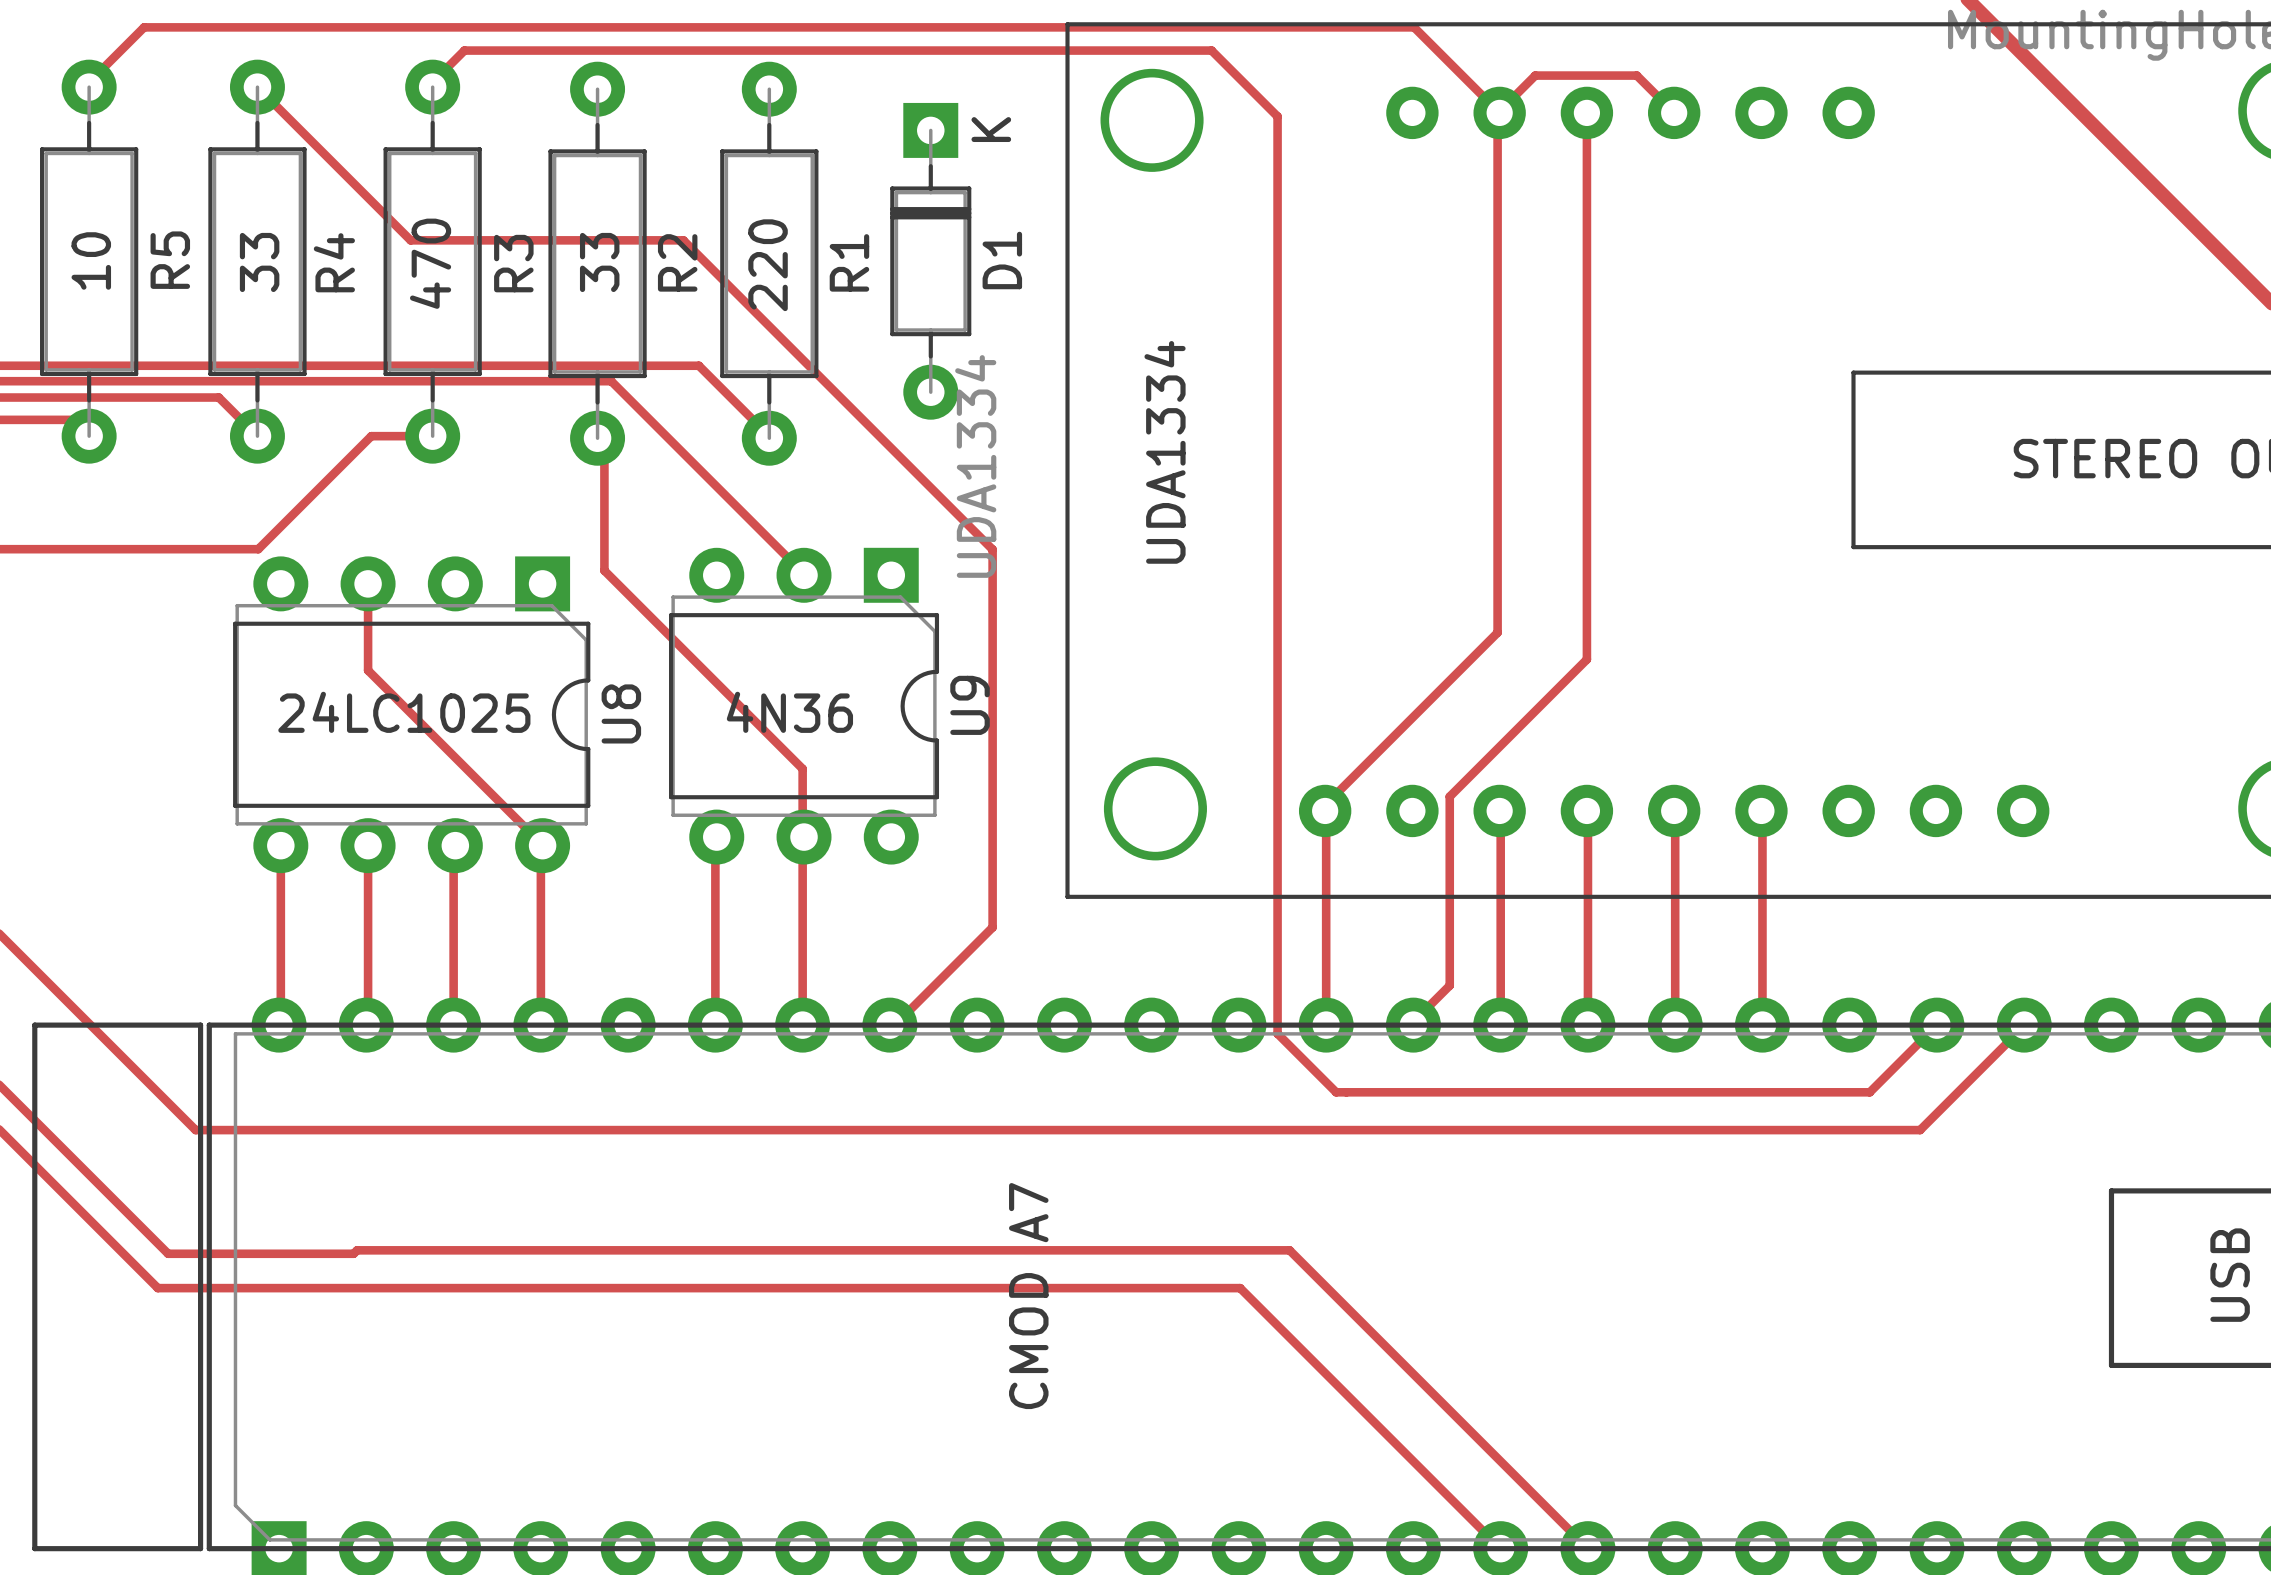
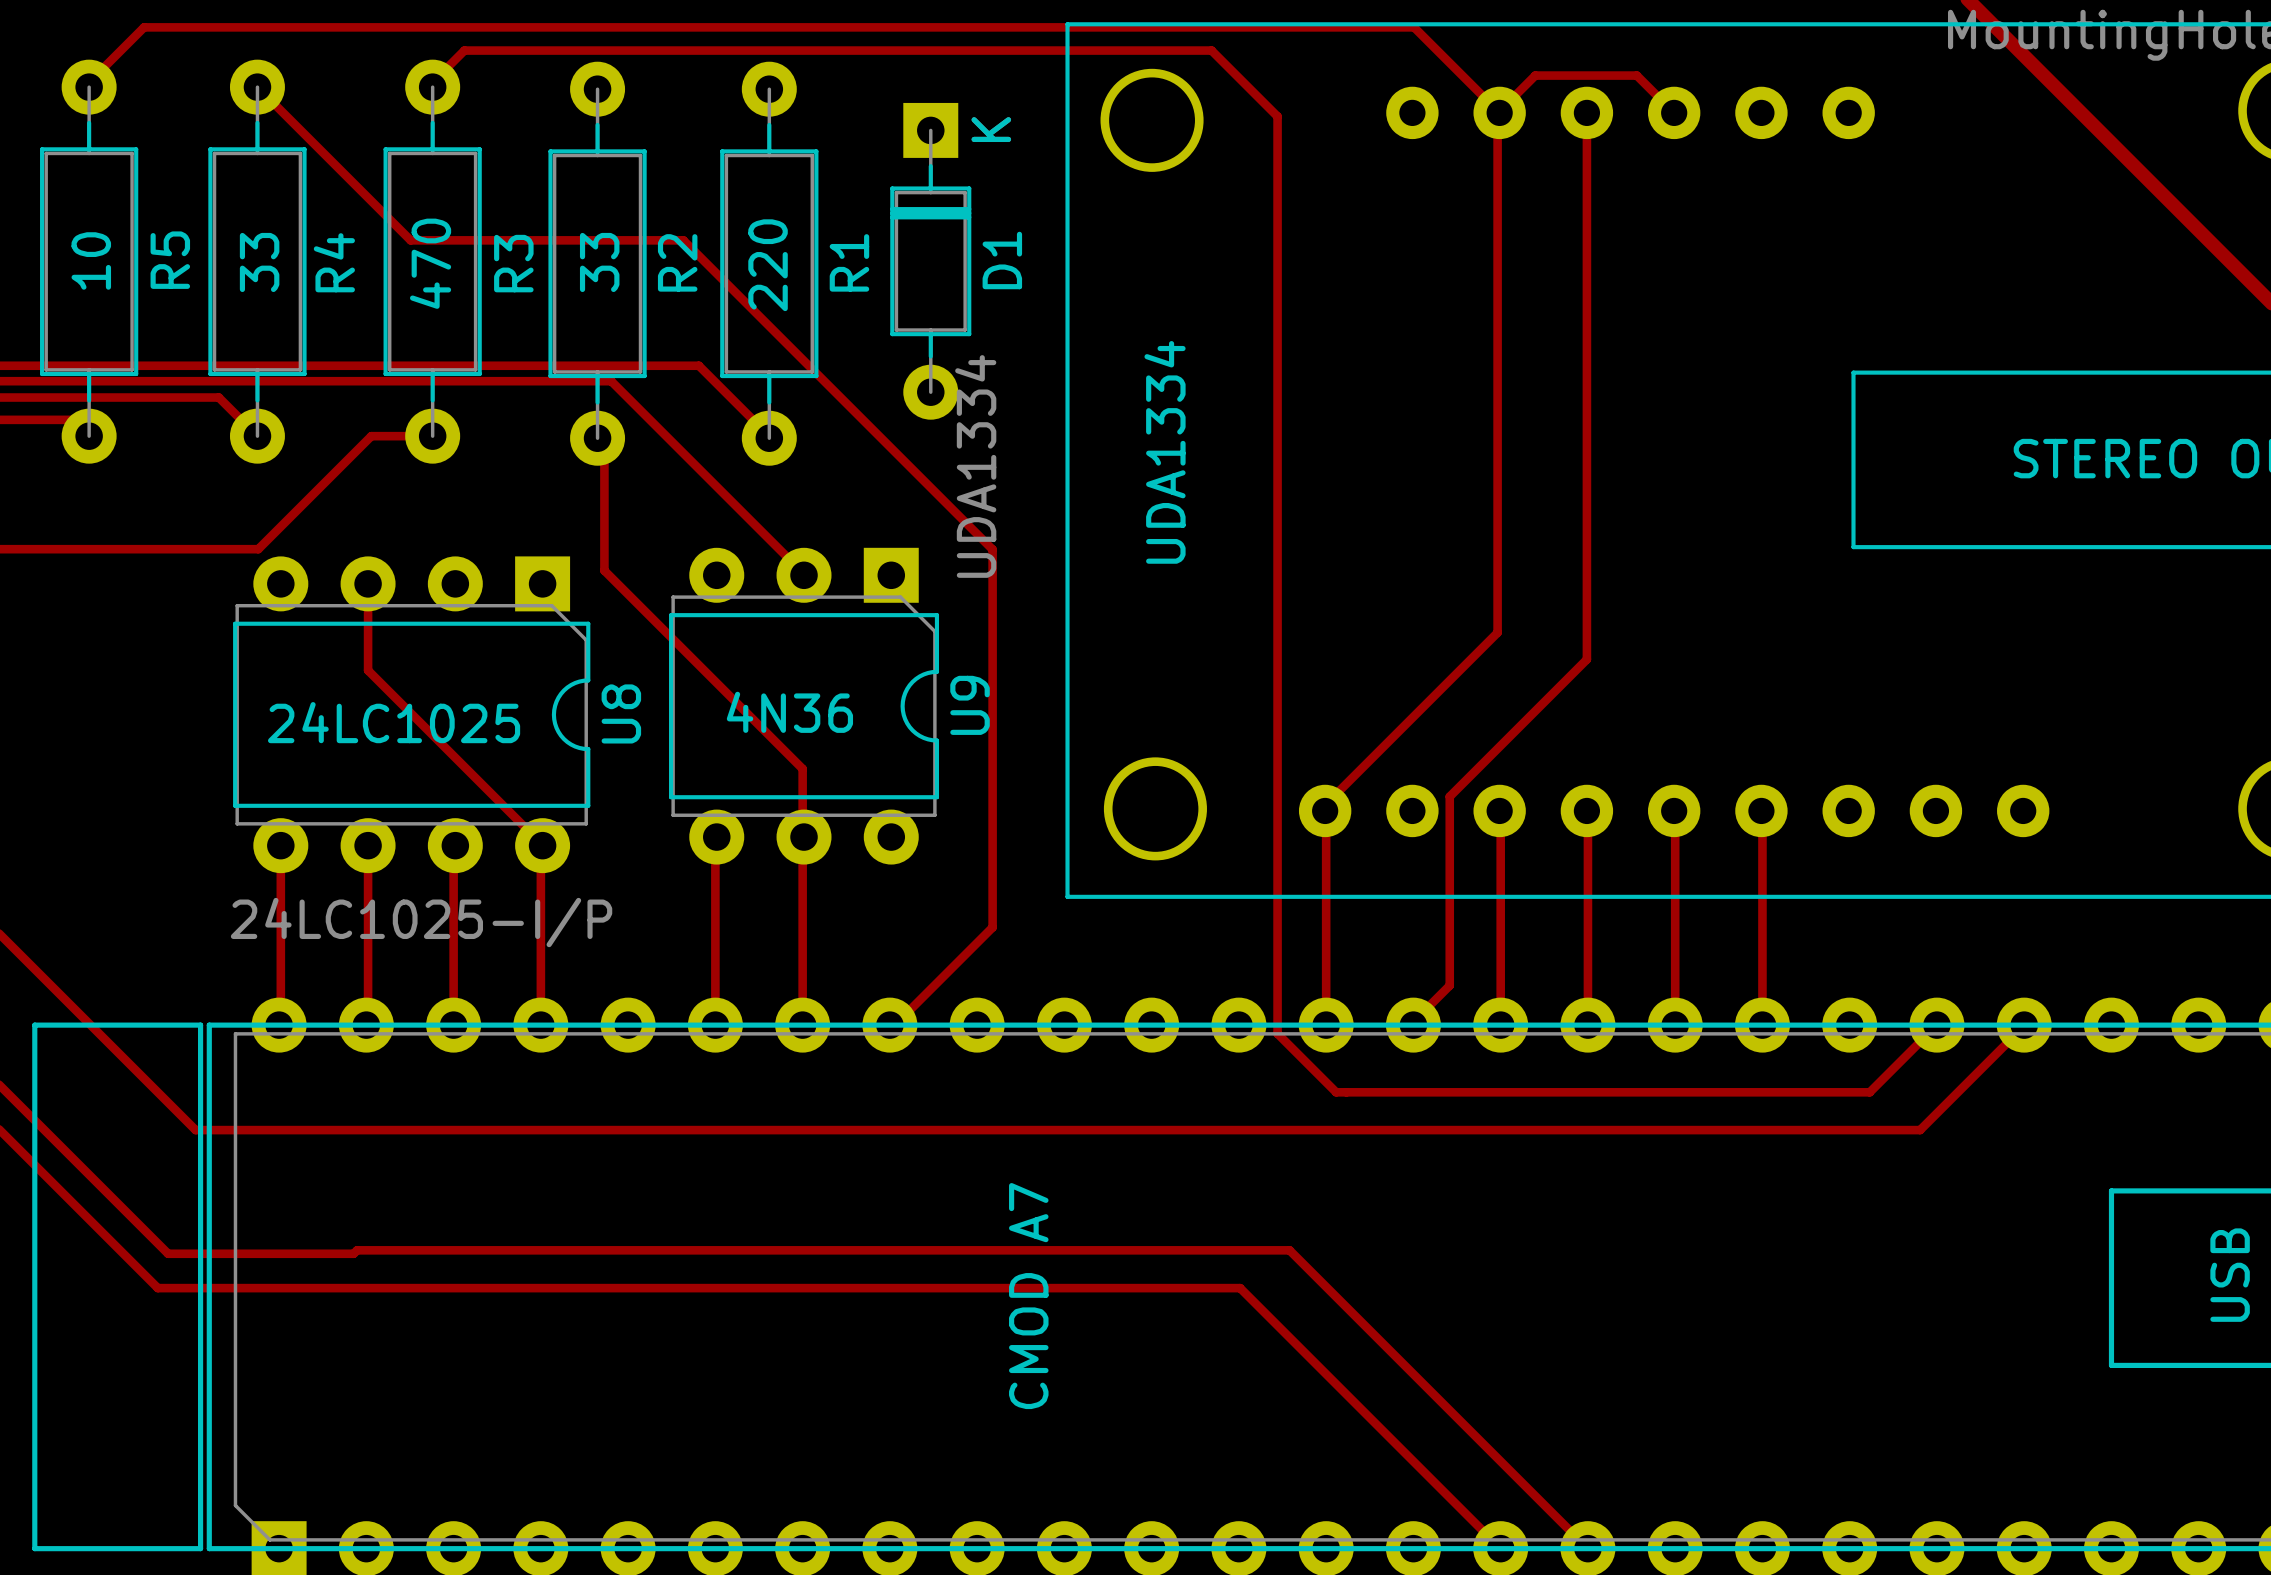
U8 value: 24LC1025 (404, 712) -> 24LC1025-I/P (421, 922)
text: none -> 24LC1025 (394, 722)

